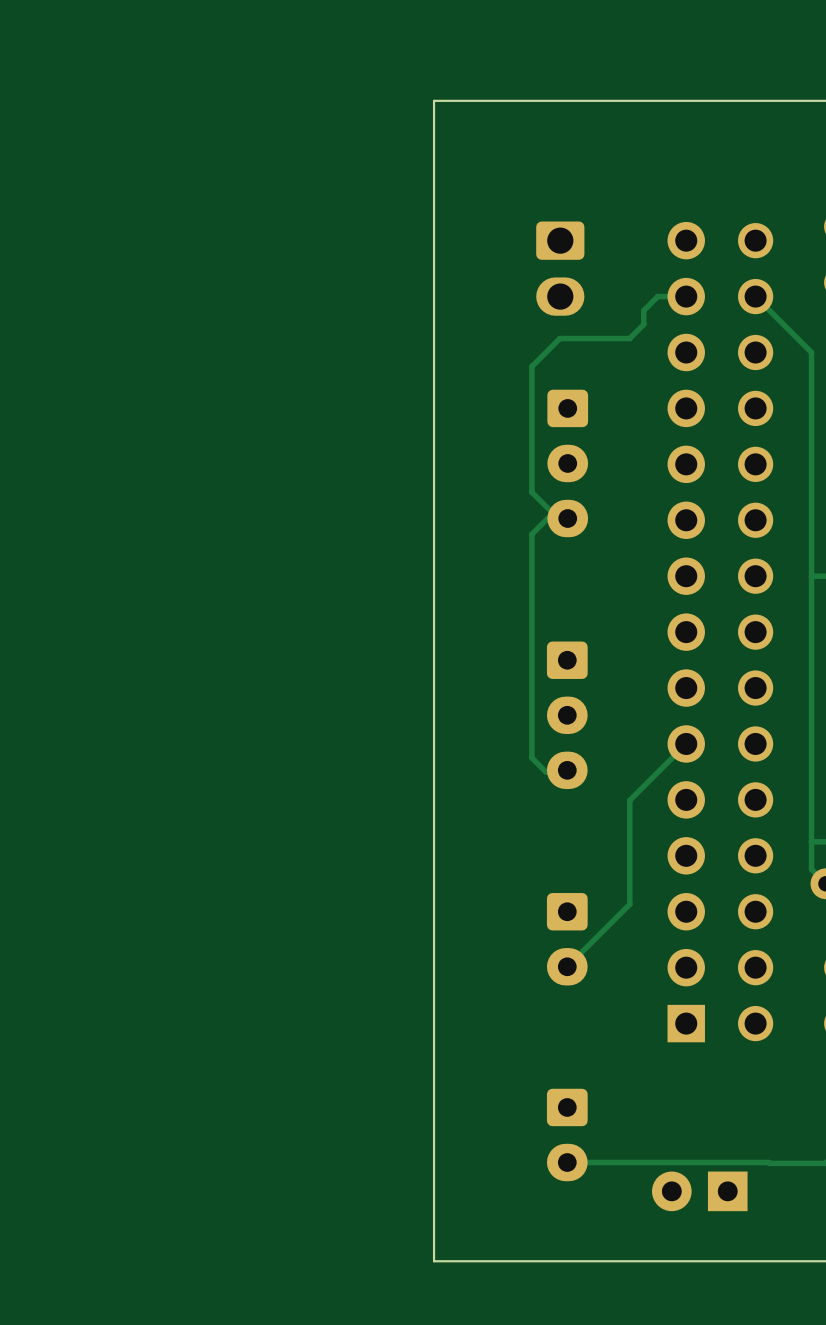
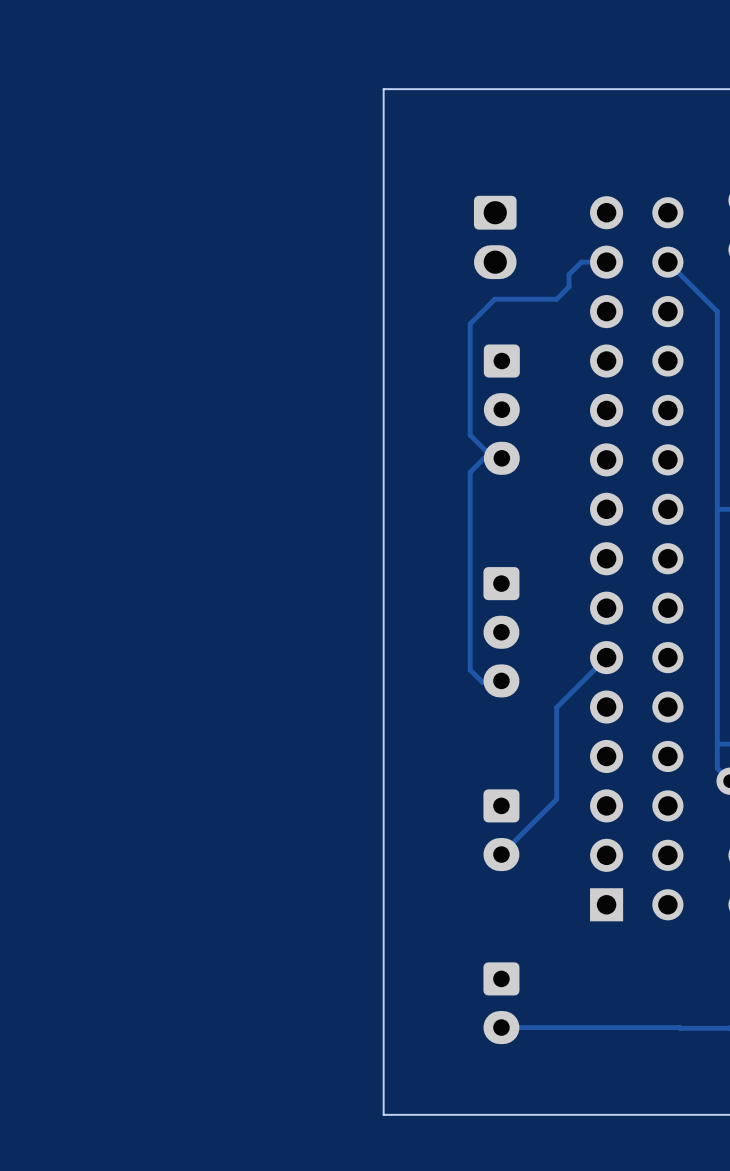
part: (699, 1191) -> none

